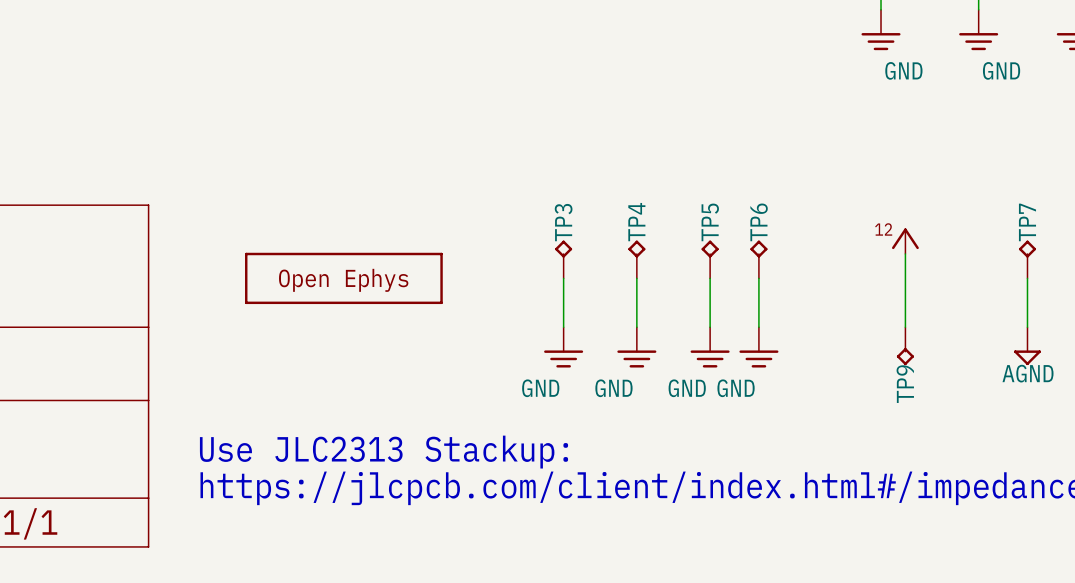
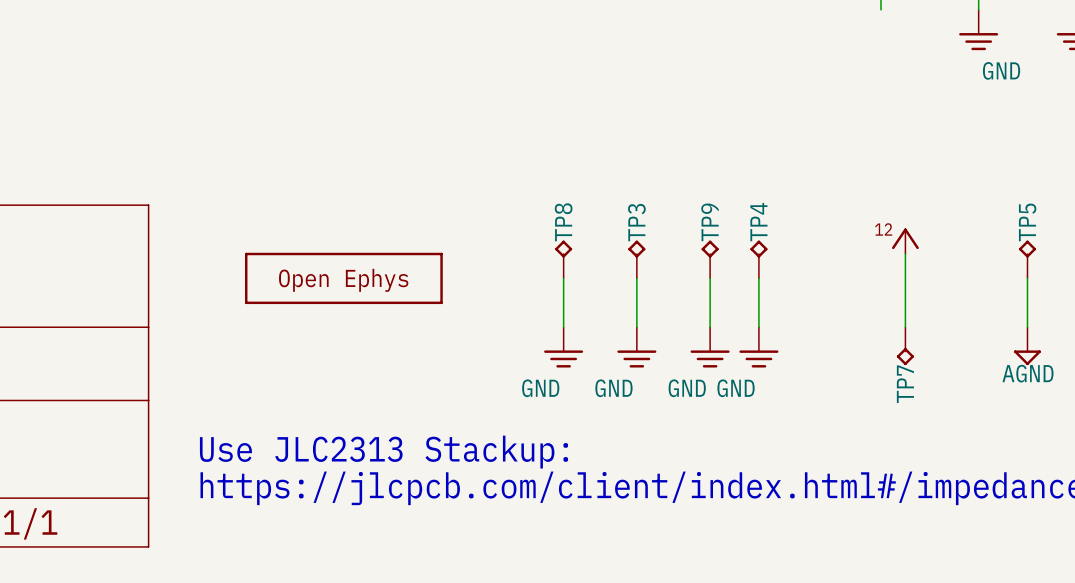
power symbol: GND (881, 30) -> none
TP3 name: TP3 (563, 222) -> TP8 (563, 222)
TP4 name: TP4 (636, 222) -> TP3 (636, 222)
TP5 name: TP5 (710, 222) -> TP9 (709, 222)
TP6 name: TP6 (759, 222) -> TP4 (758, 222)
TP7 name: TP7 (1027, 222) -> TP5 (1027, 222)
TP9 name: TP9 (905, 384) -> TP7 (905, 384)

